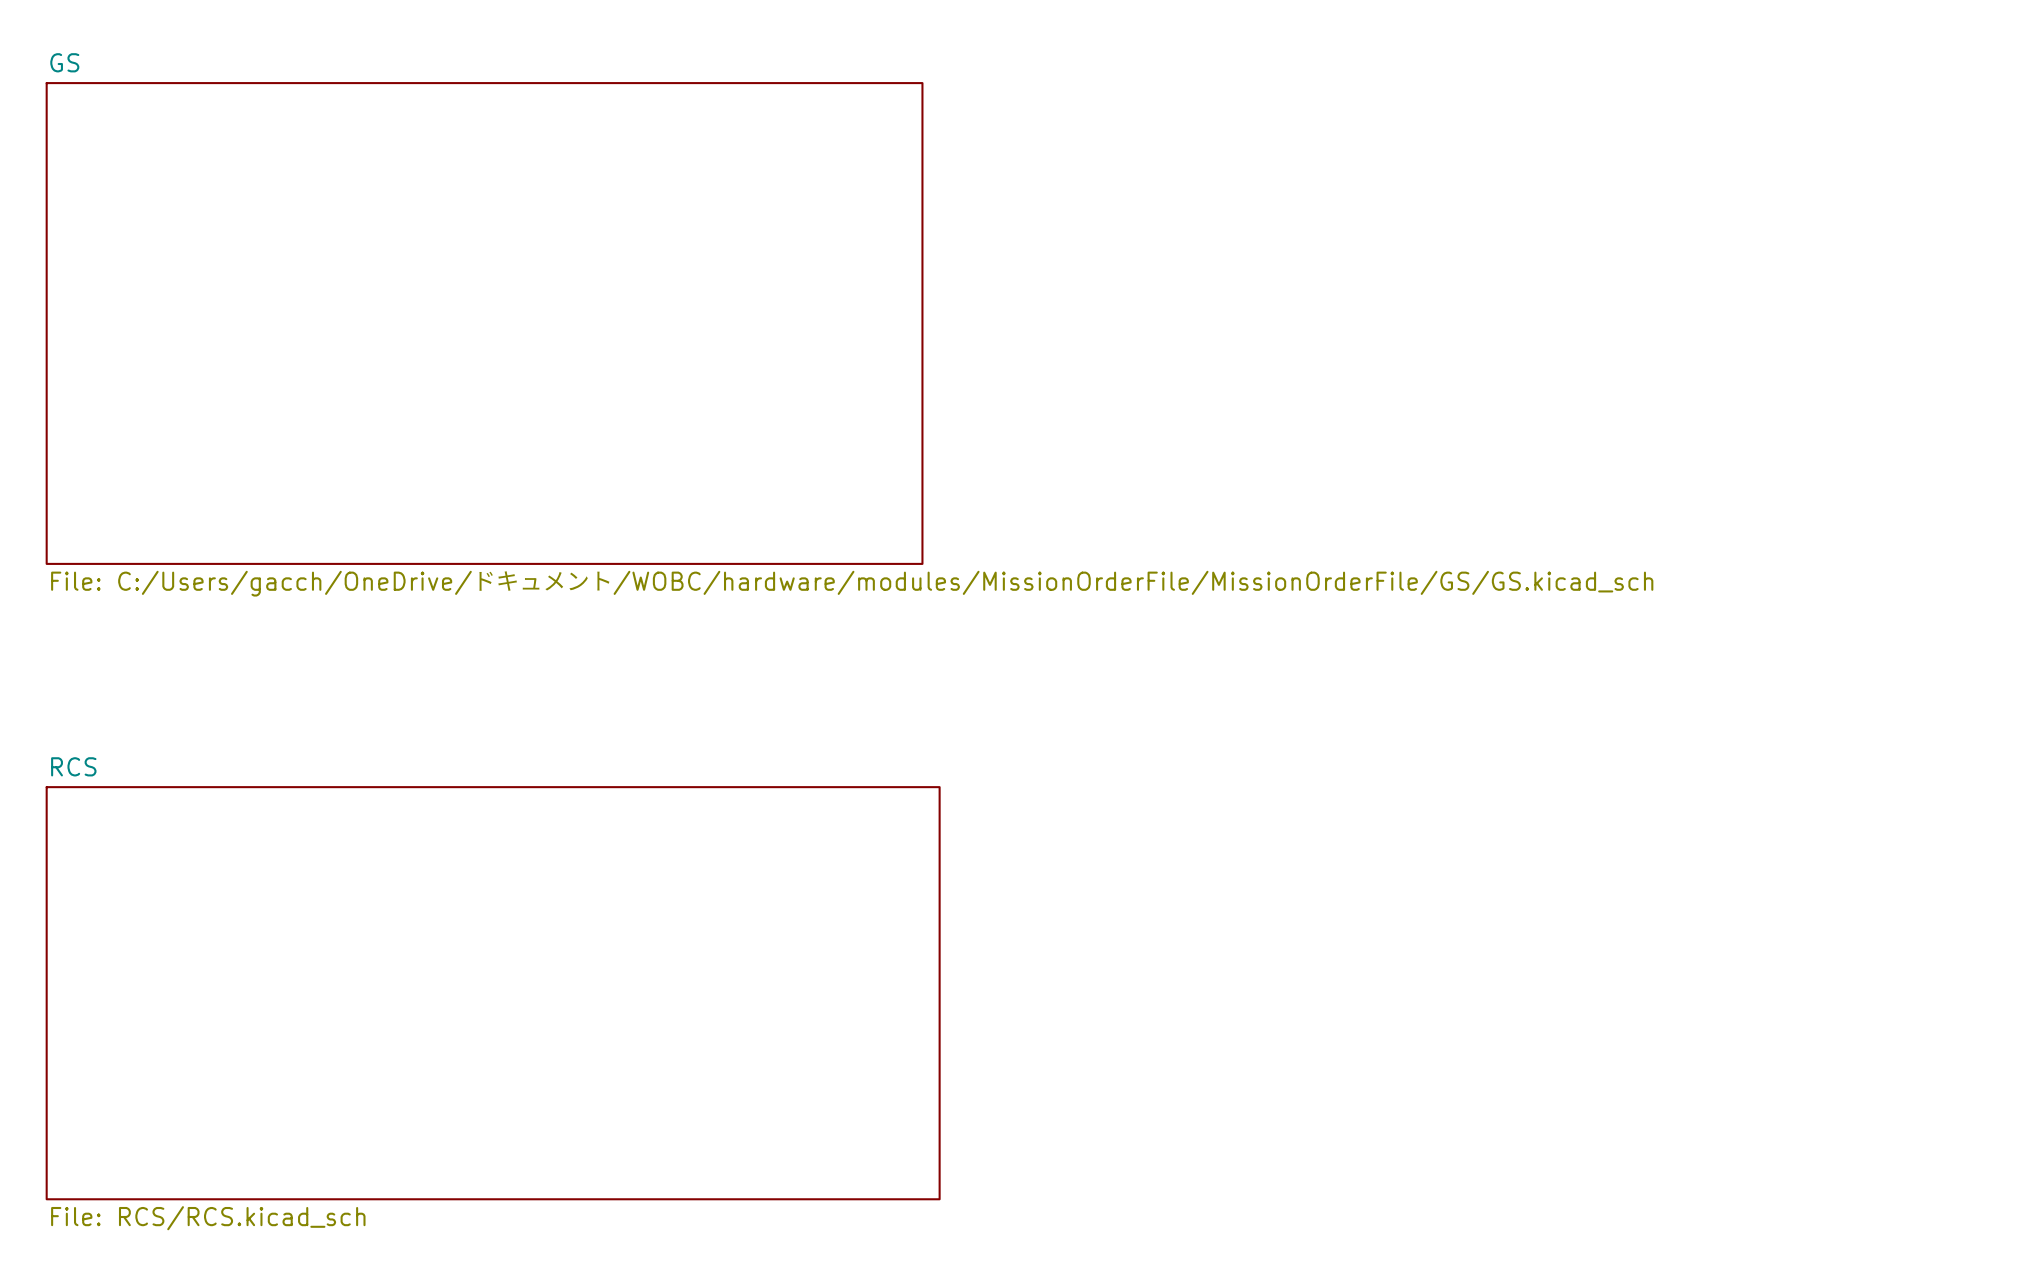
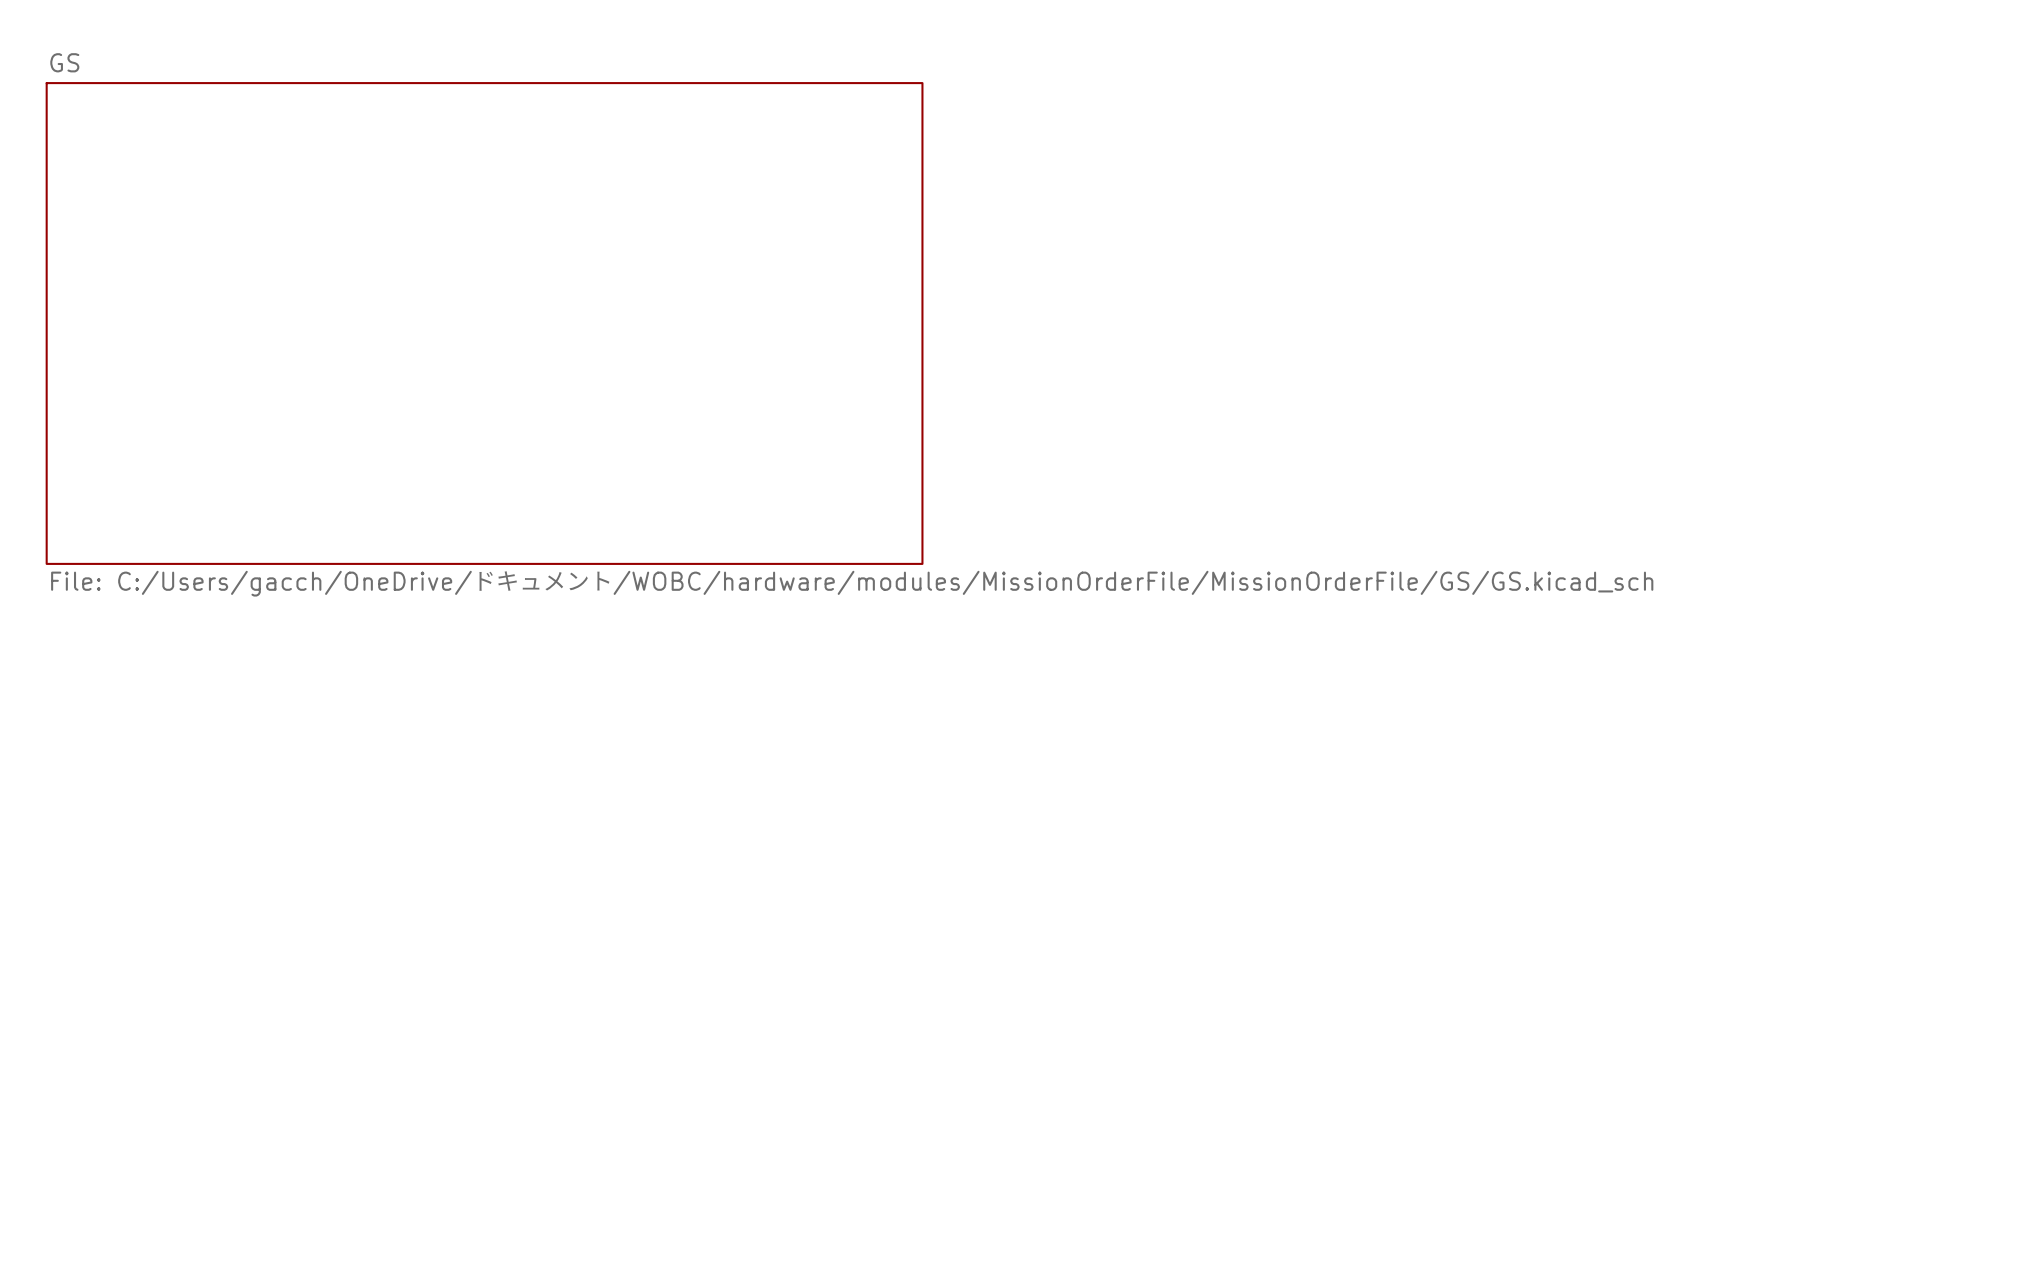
sheet RCS: File: RCS/RCS.kicad_sch (493, 993) -> none

